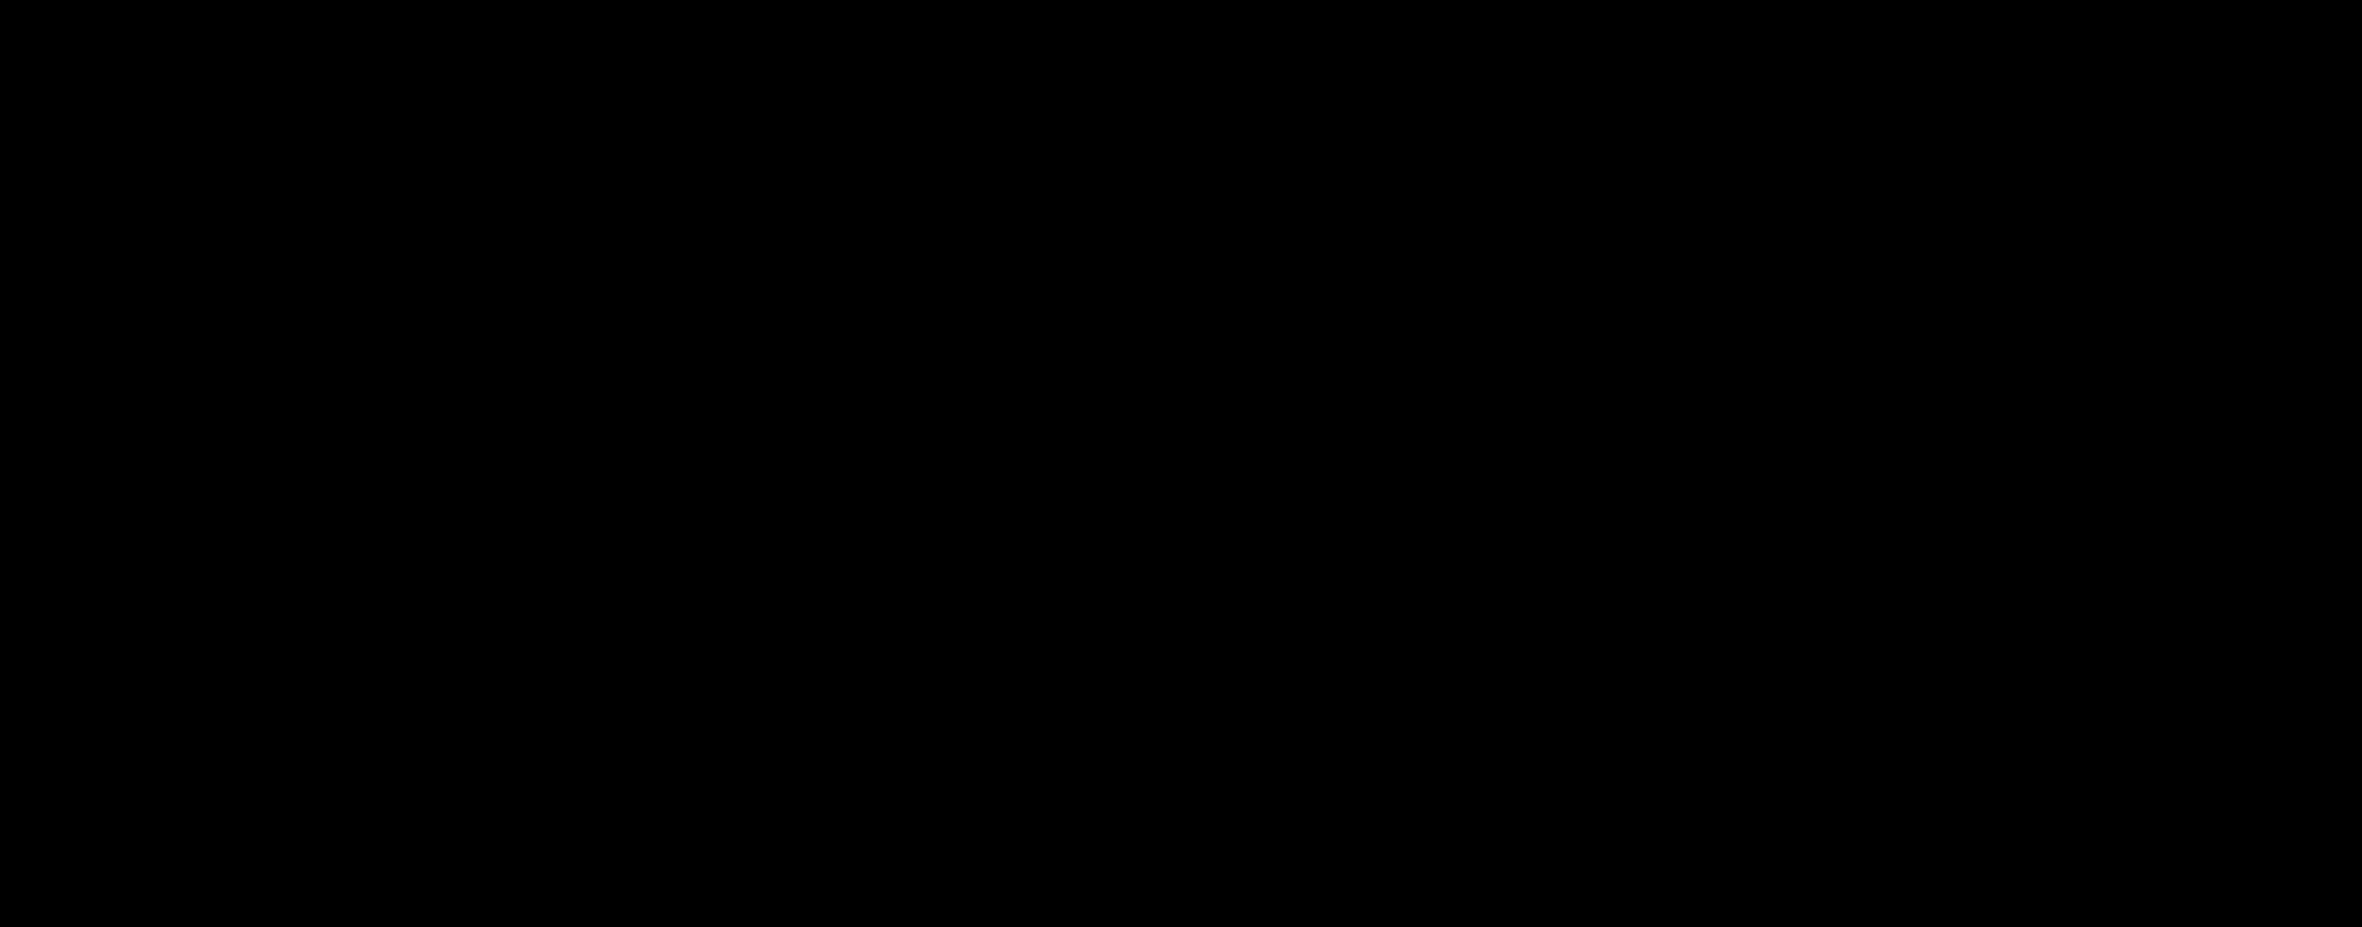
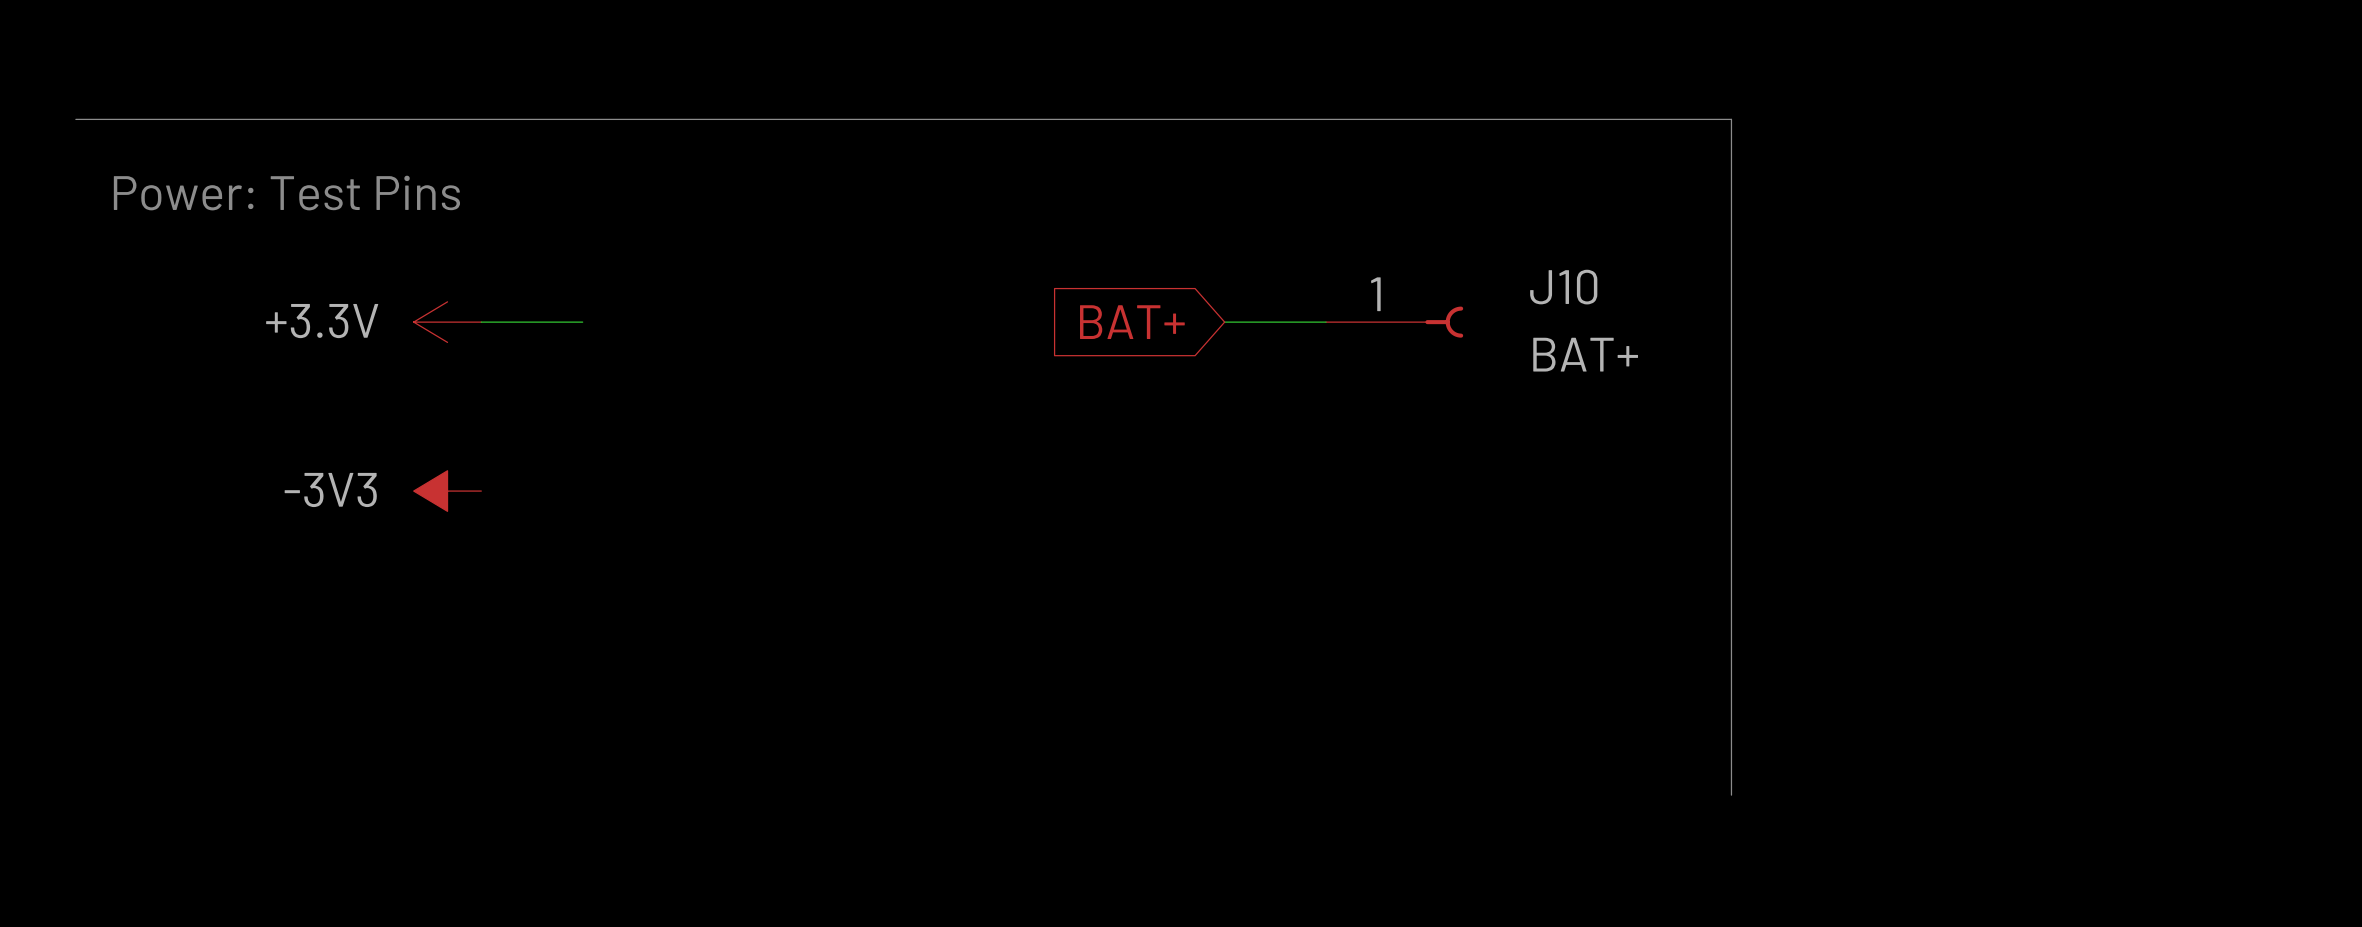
line: none -> (75, 119) (1731, 119) (1731, 795)
text: none -> Power: Test Pins (286, 193)
power symbol: none -> +3.3V (447, 322)
wire: none -> (481, 322) (582, 322)
global label: none -> BAT+ (1132, 322)
wire: none -> (1224, 322) (1326, 322)
J10: none -> BAT+ (1394, 322)
power symbol: none -> -3V3 (447, 491)

